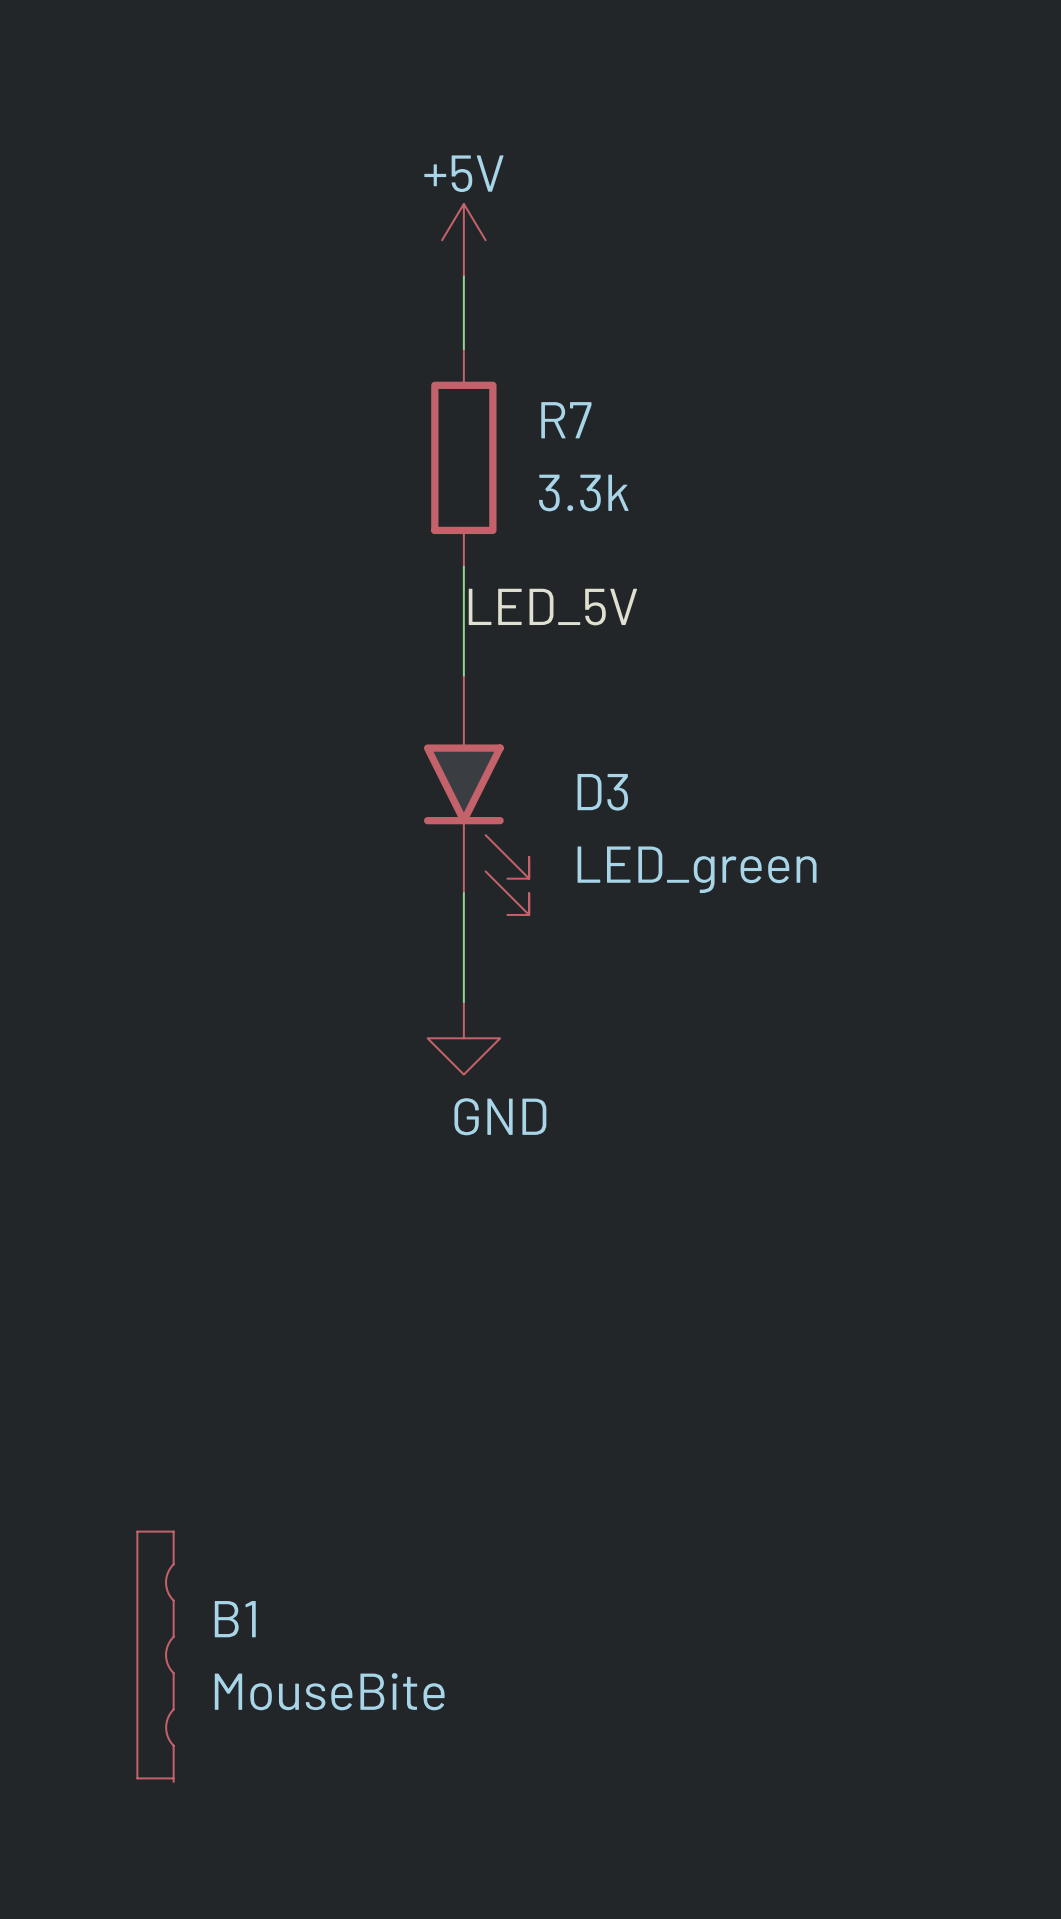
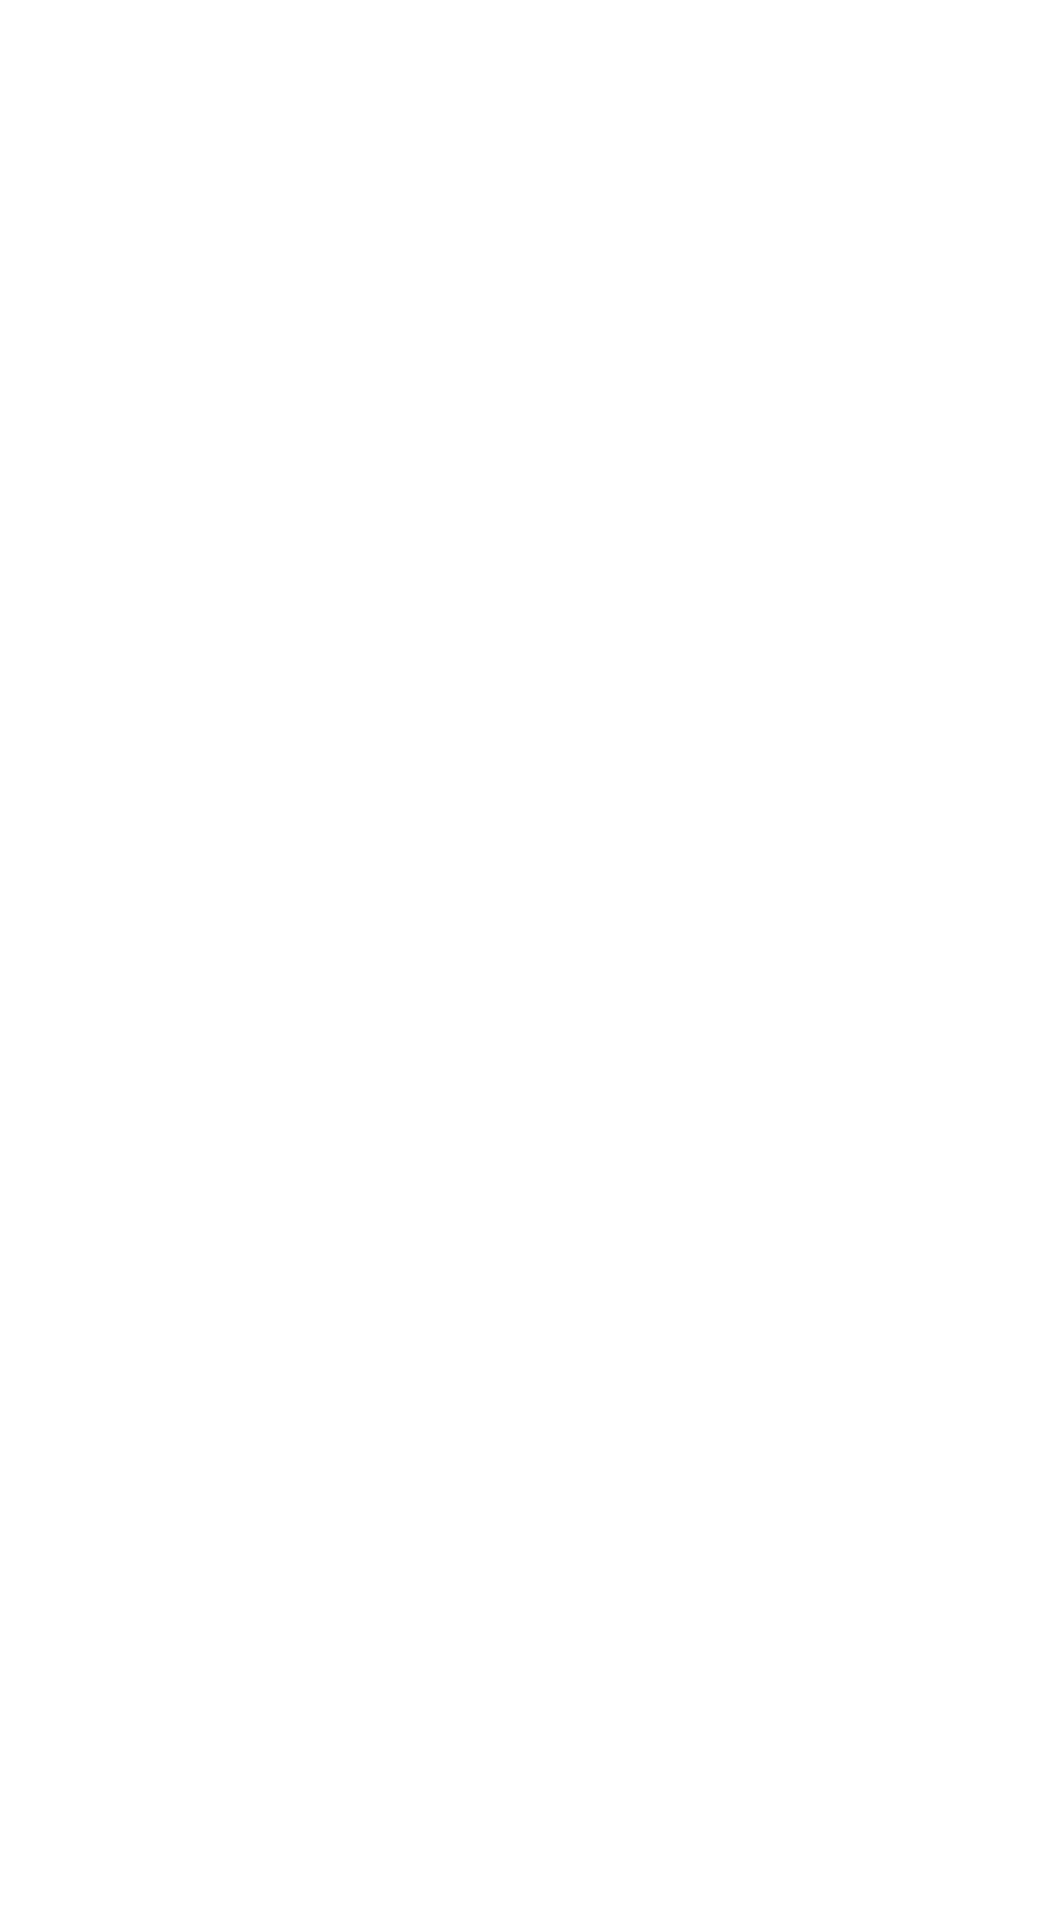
power symbol: +5V (463, 240) -> none
wire: (463, 276) (463, 349) -> none
R7: 3.3k (463, 457) -> none
wire: (463, 566) (463, 675) -> none
label: LED_5V (552, 607) -> none
D3: LED_green (476, 795) -> none
wire: (463, 893) (463, 1002) -> none
power symbol: GND (463, 1038) -> none
B1: MouseBite (155, 1656) -> none

